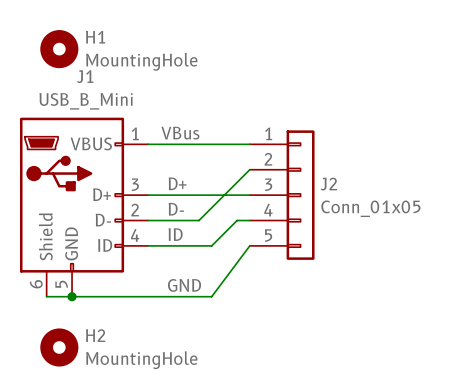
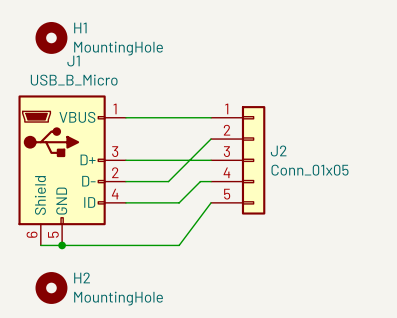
J1 value: USB_B_Mini (86, 101) -> USB_B_Micro (74, 80)
label: VBus (180, 133) -> none
label: D+ (177, 183) -> none
label: D- (176, 209) -> none
label: ID (175, 234) -> none
label: GND (184, 285) -> none

